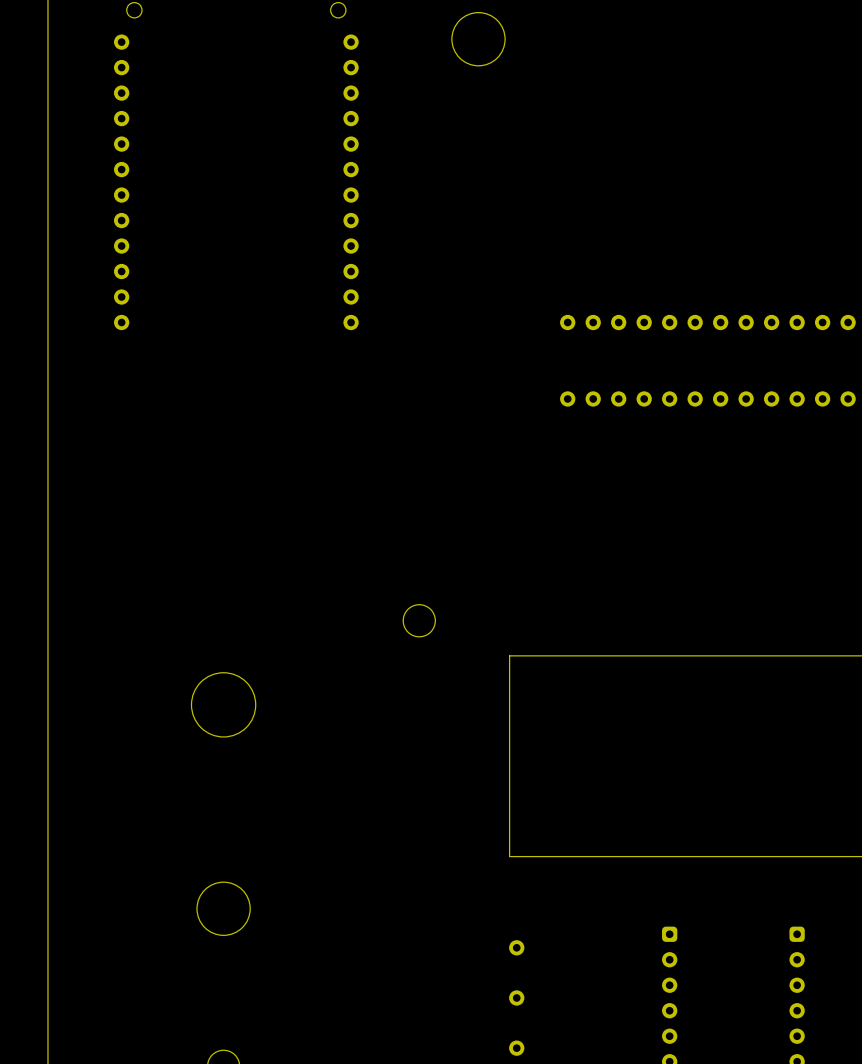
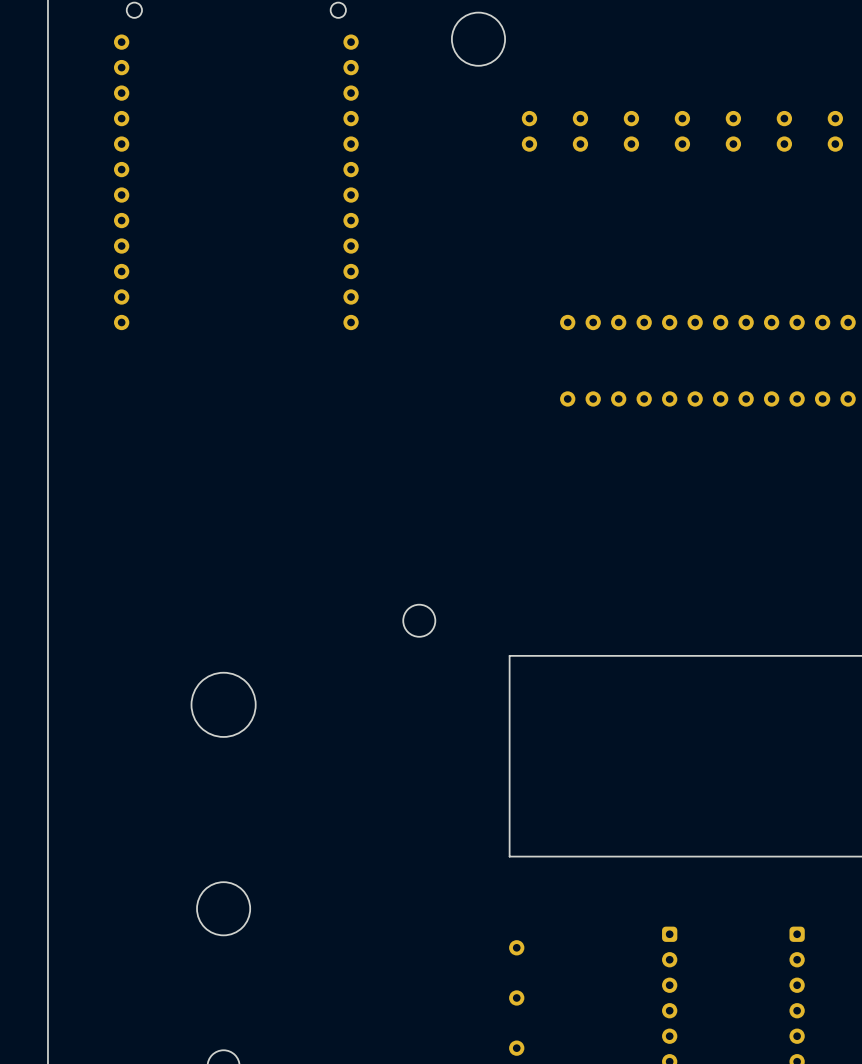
part: none -> (529, 131)
part: none -> (580, 131)
part: none -> (631, 131)
part: none -> (682, 131)
part: none -> (733, 131)
part: none -> (784, 131)
part: none -> (835, 131)

